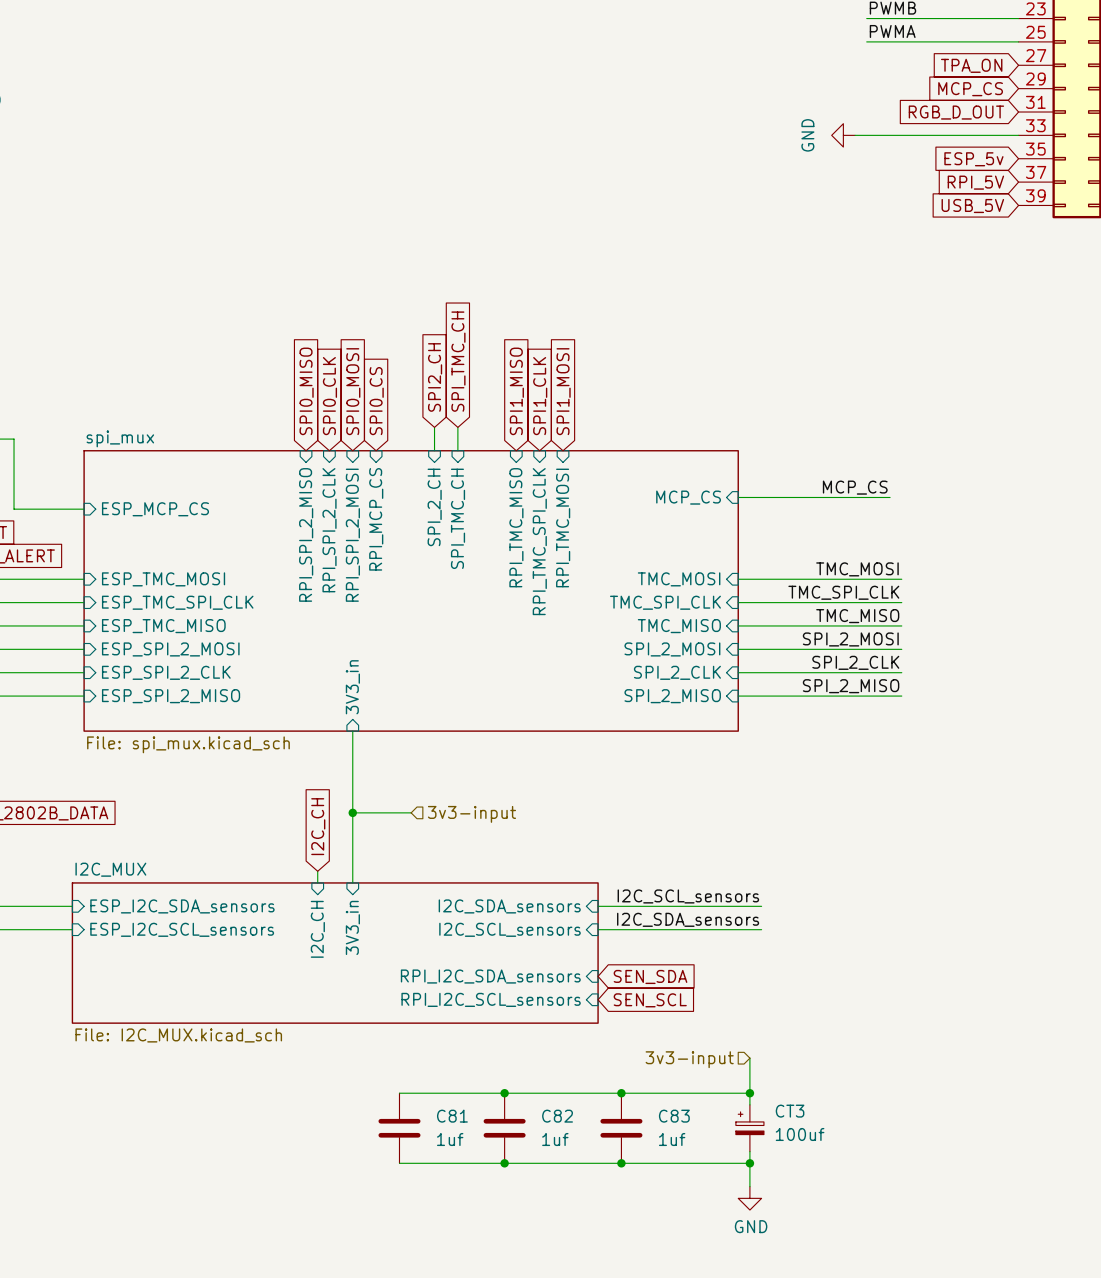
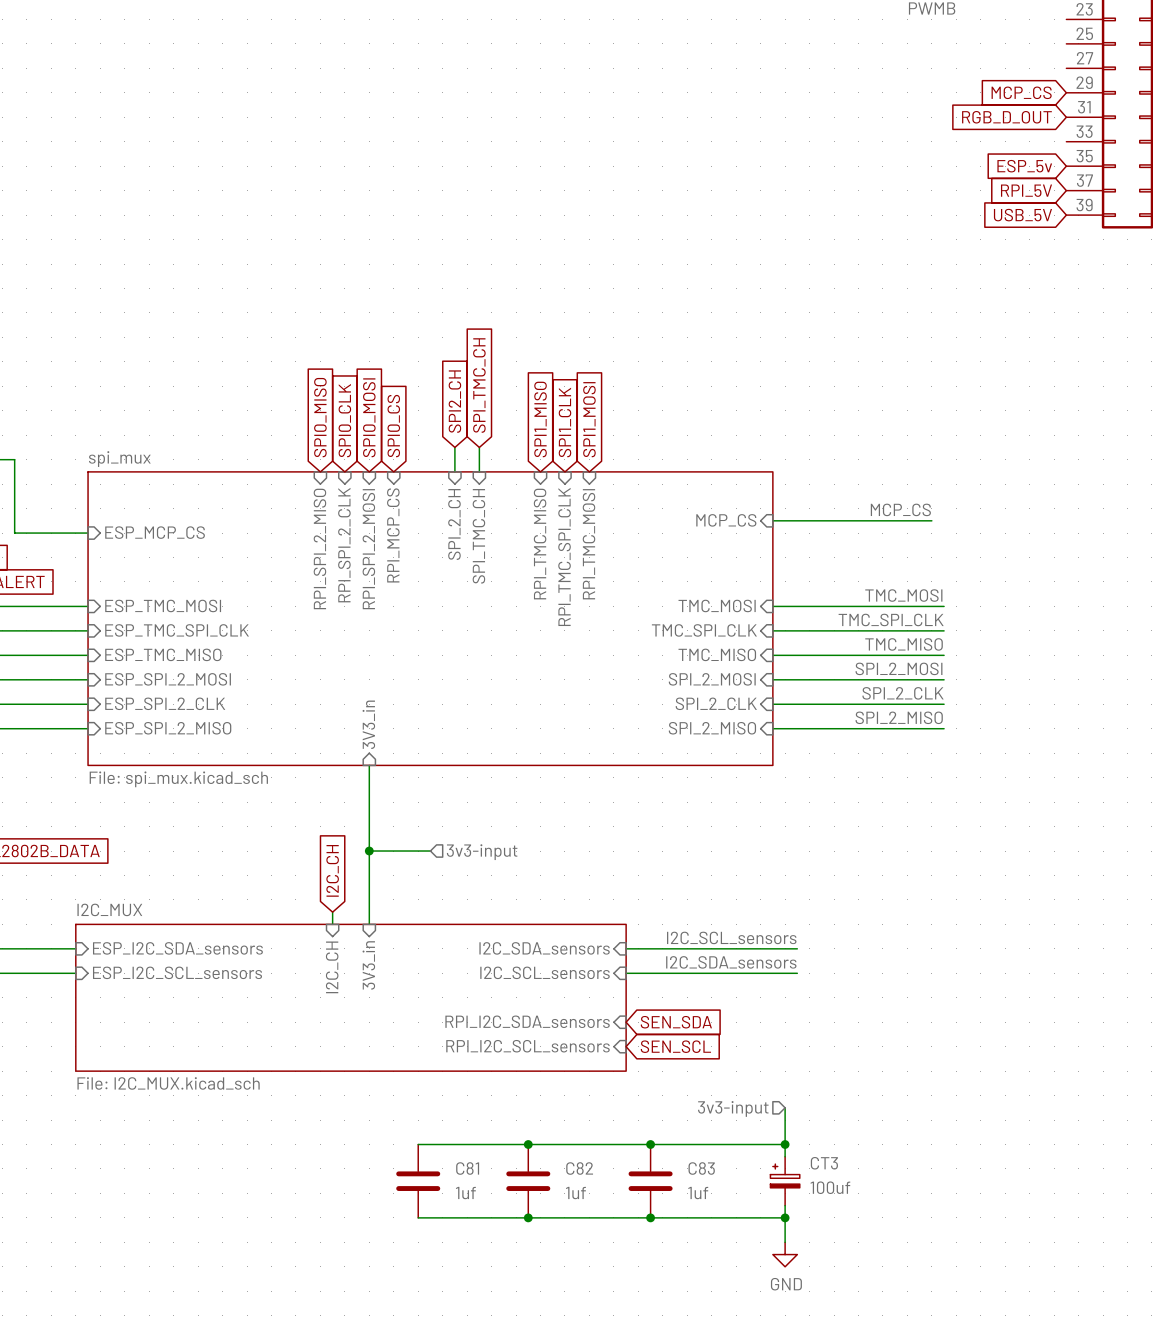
wire: (866, 18) (1018, 18) -> none
label: PWMA (892, 31) -> none
wire: (866, 41) (1018, 41) -> none
global label: TPA_ON (971, 65) -> none
power symbol: GND (843, 135) -> none
wire: (855, 135) (1018, 135) -> none

